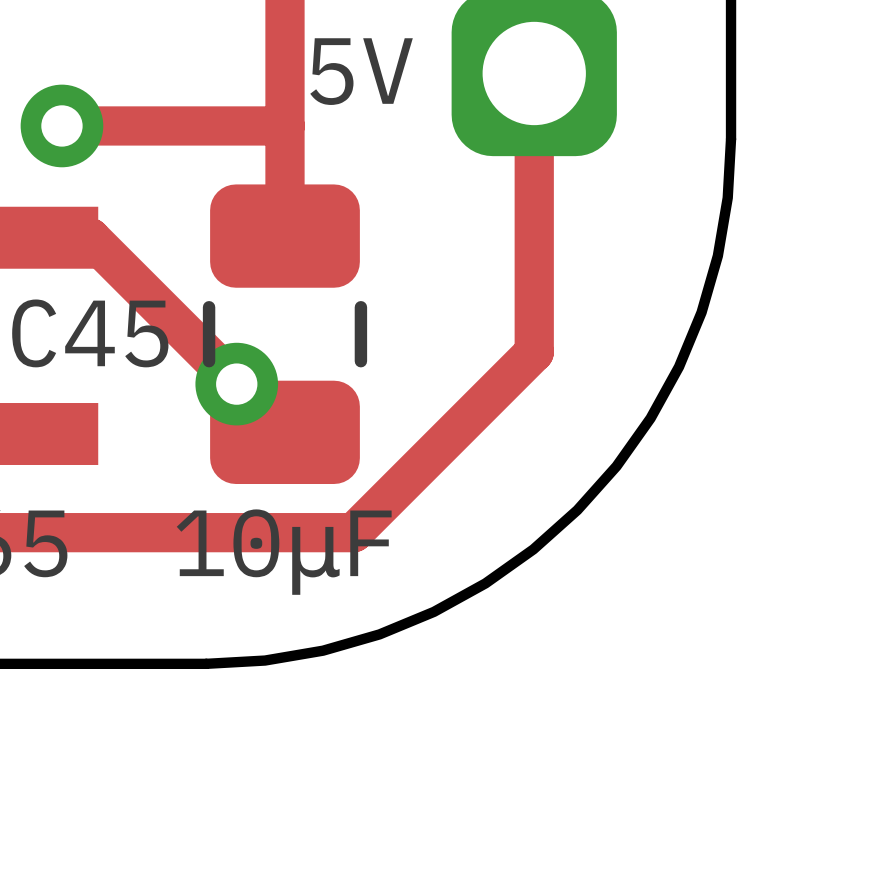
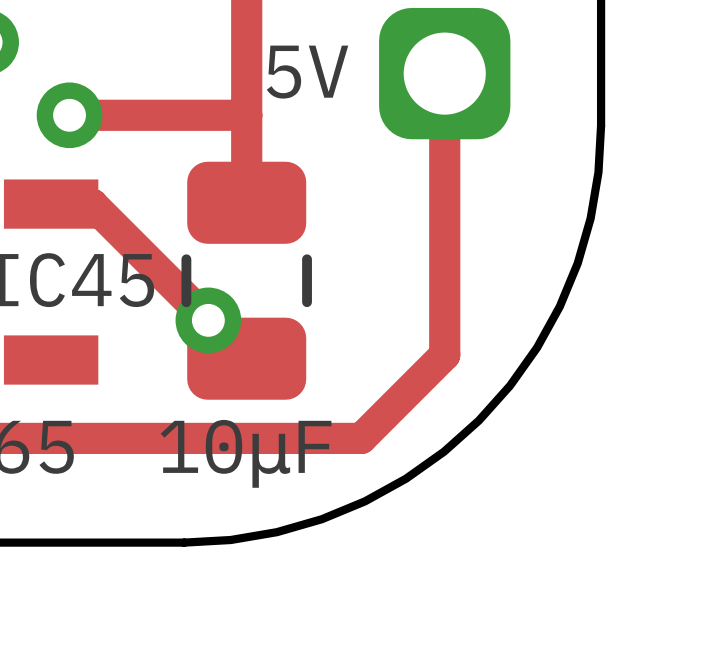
track: (534, 352) (353, 532) -> (444, 295) (444, 355) (361, 438) (301, 438)

